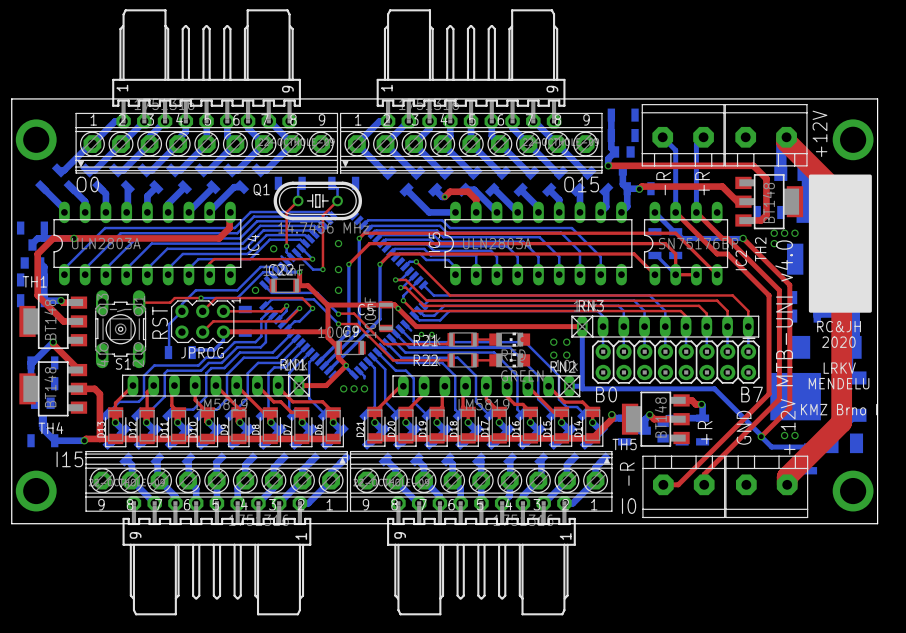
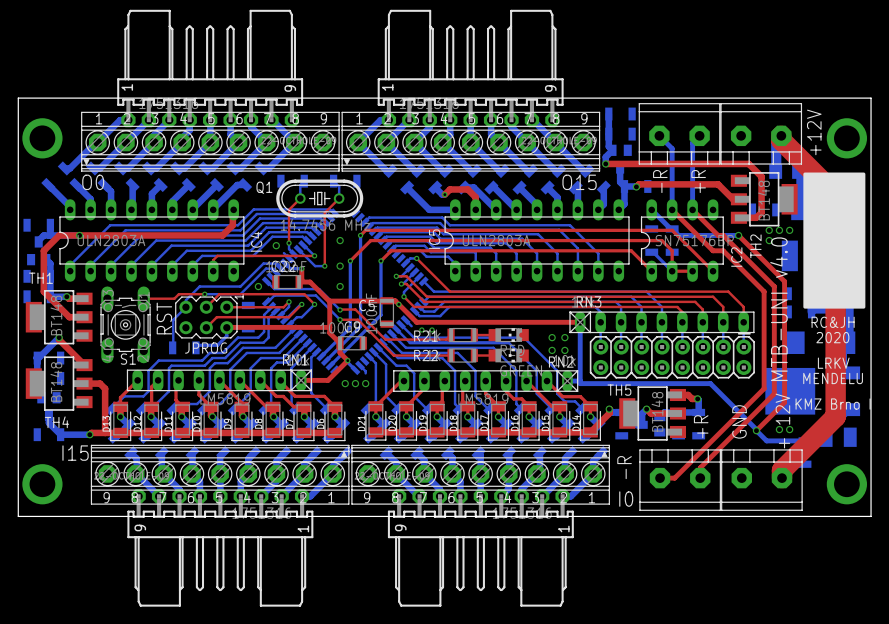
text: B0 (606, 394) -> none
text: B7 (752, 394) -> none
TH5 name position: TH5 (624, 444) -> TH5 (619, 390)

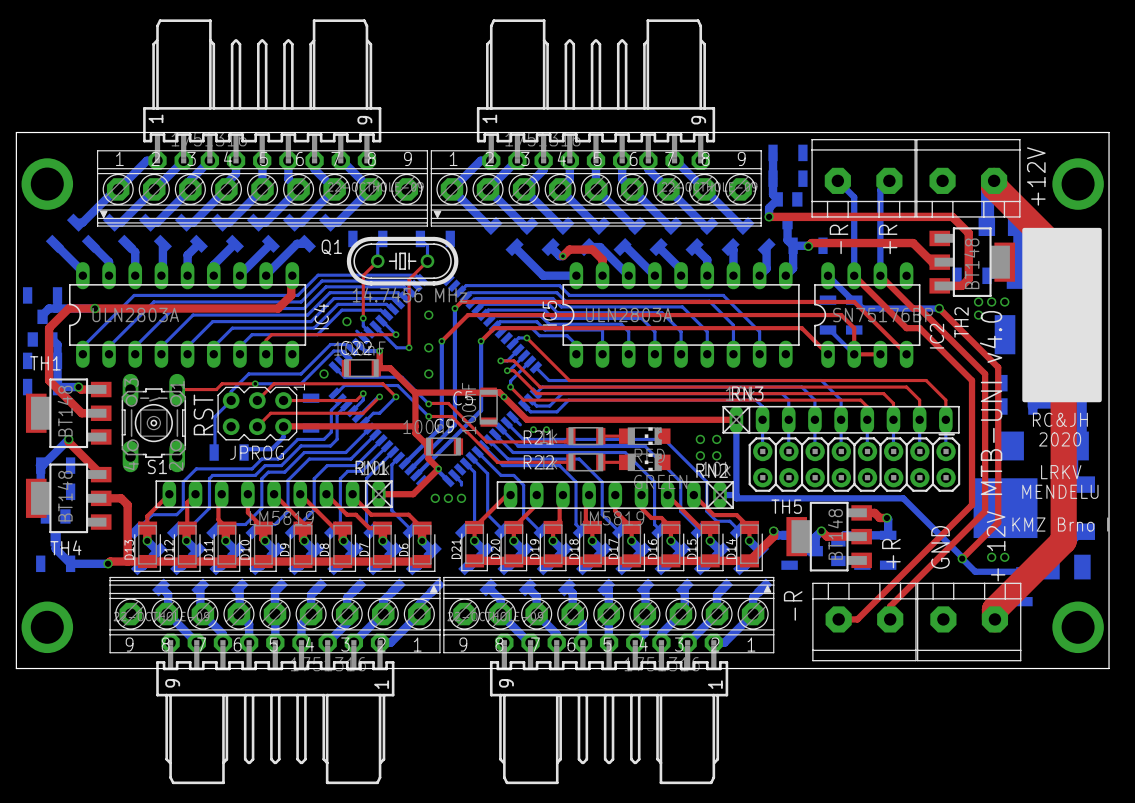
text: O0 (93, 182) -> none
text: O15 (579, 182) -> none
text: I15 (75, 453) -> none
text: I0 (626, 499) -> none

